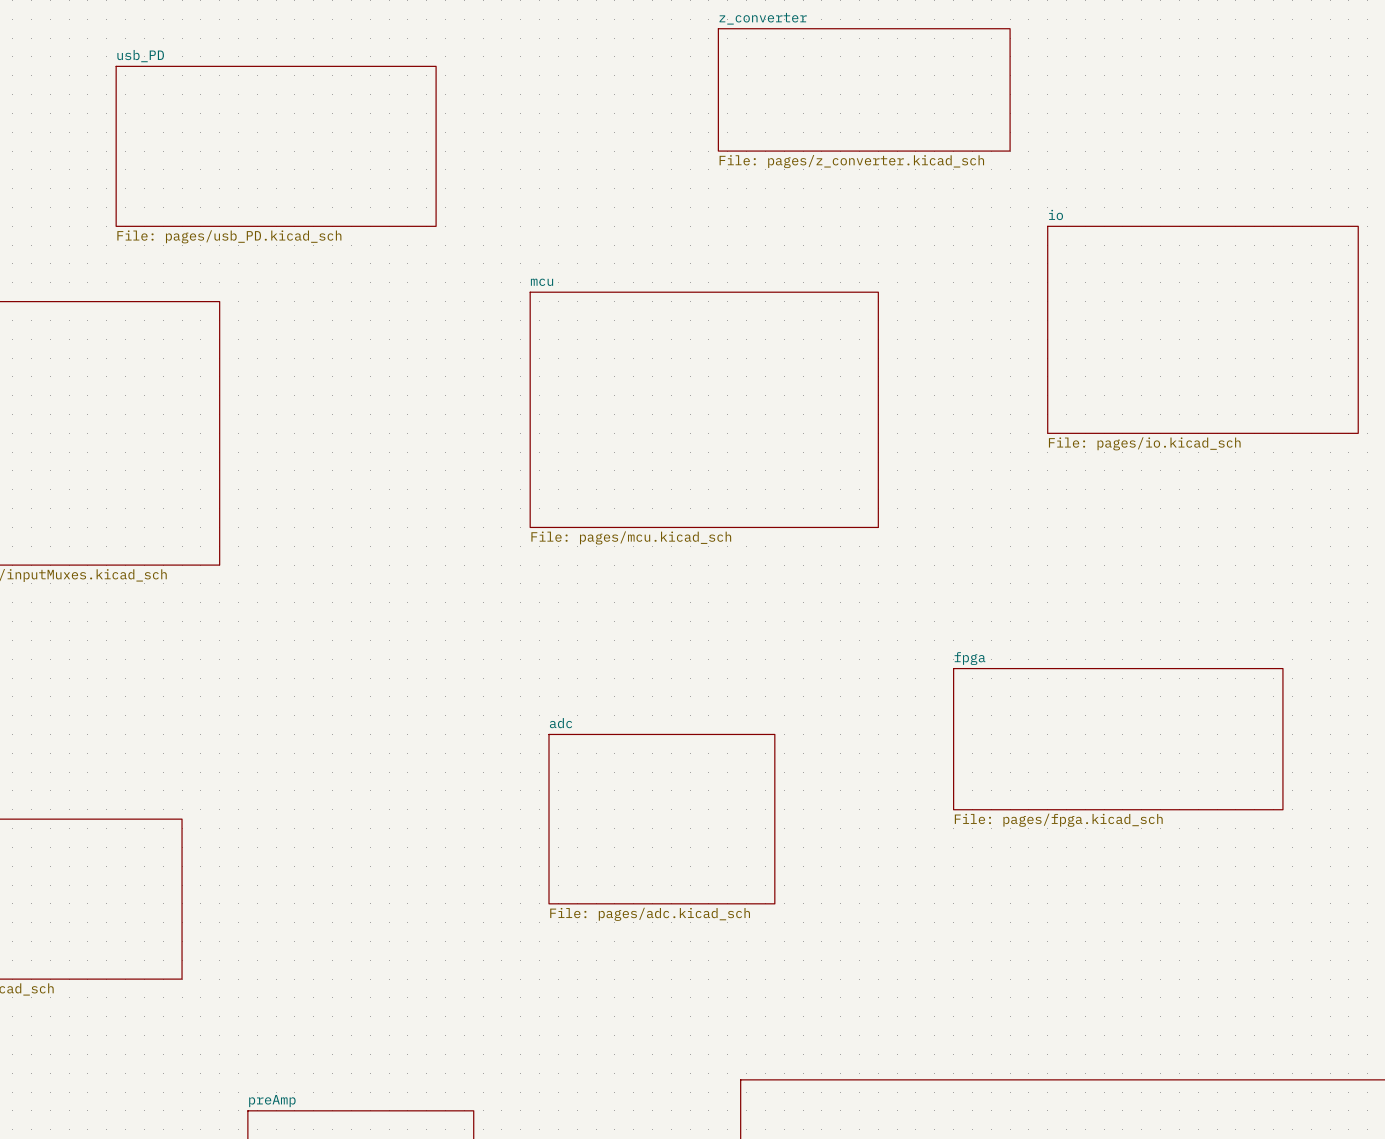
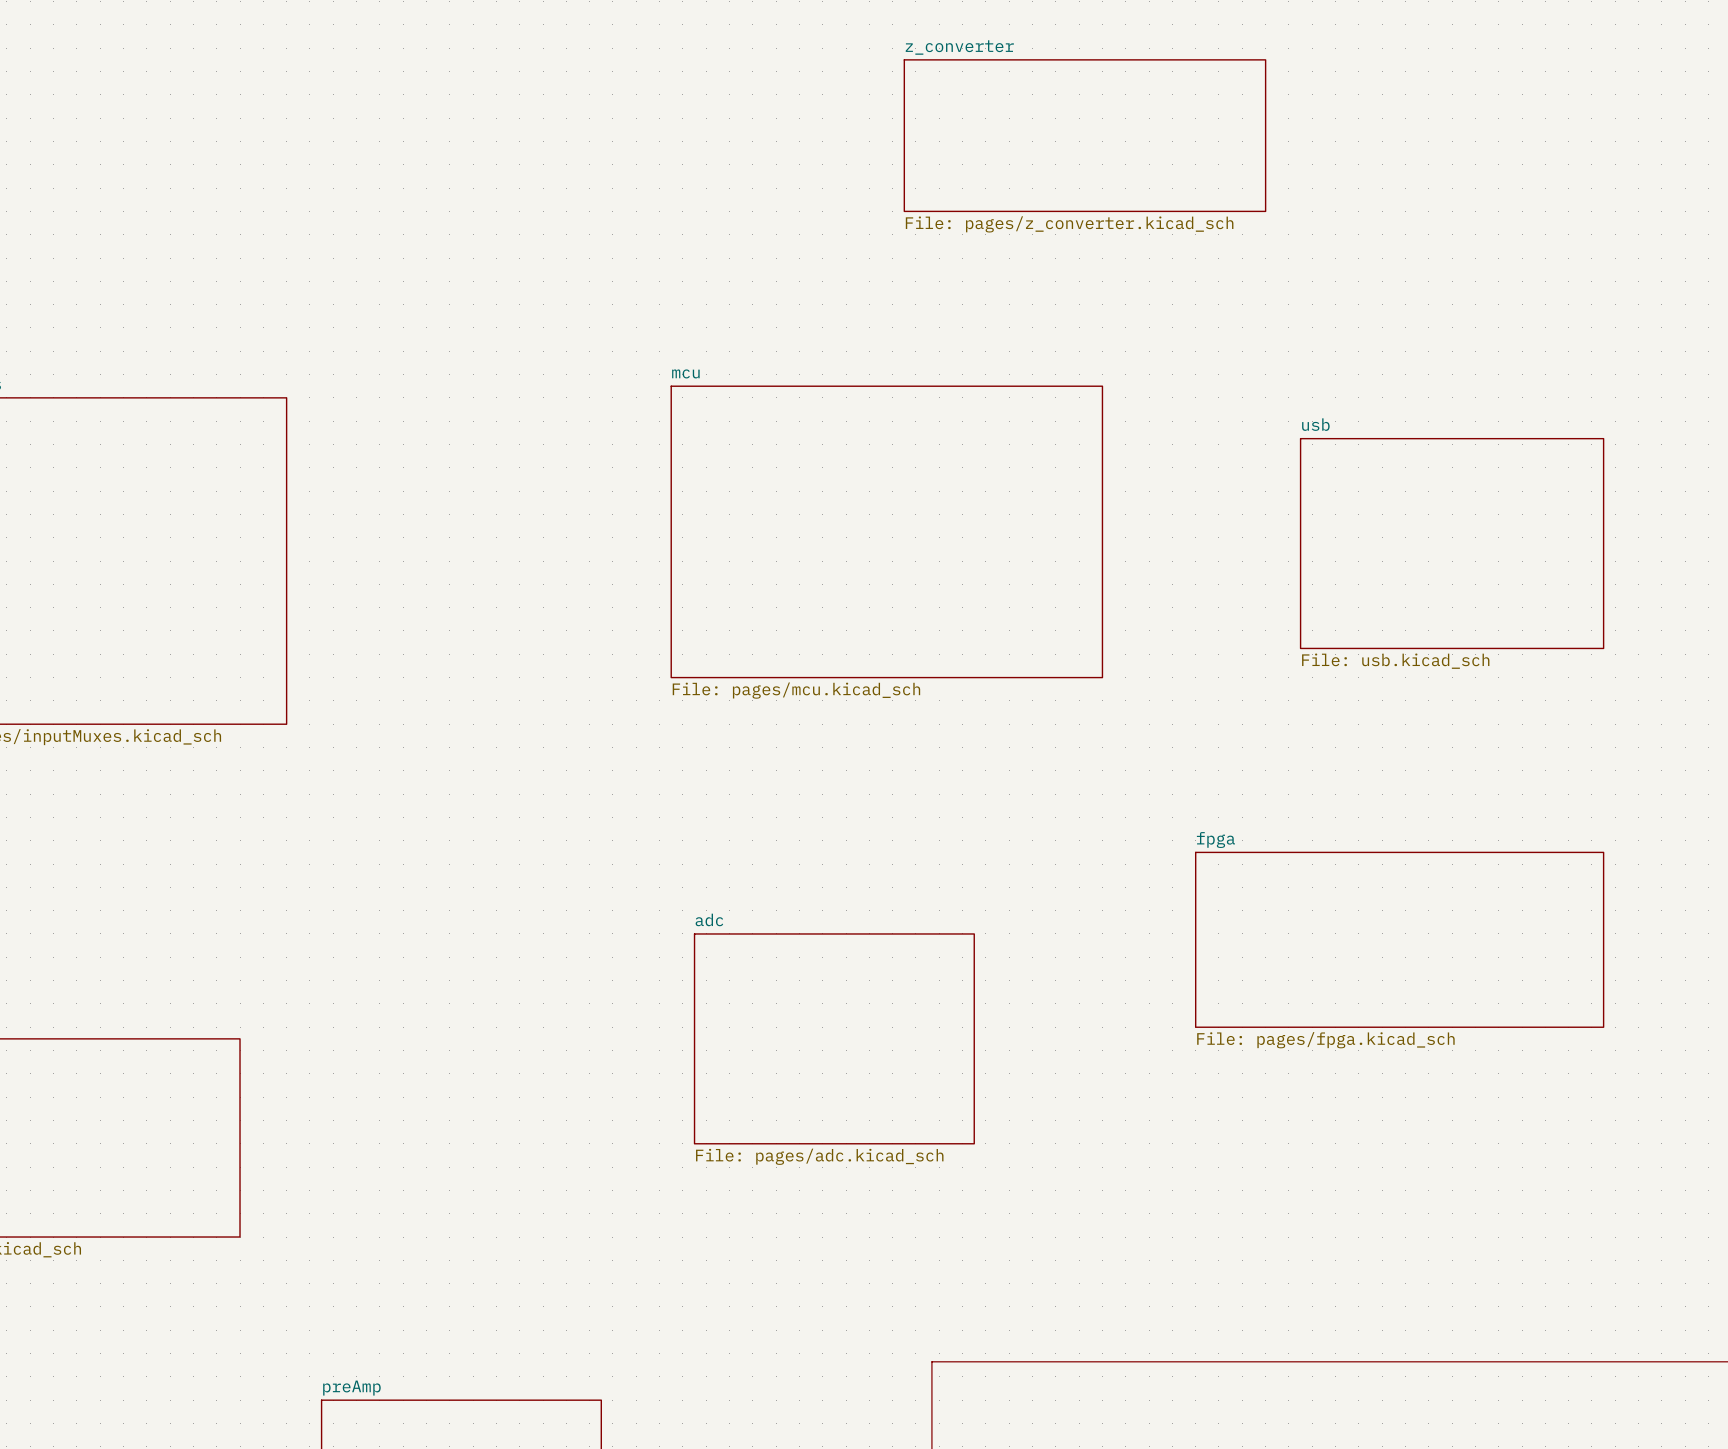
sheet usb_PD: File: pages/usb_PD.kicad_sch (276, 146) -> none
sheet io: File: pages/io.kicad_sch (1202, 329) -> none
sheet usb: none -> File: usb.kicad_sch (1452, 543)

